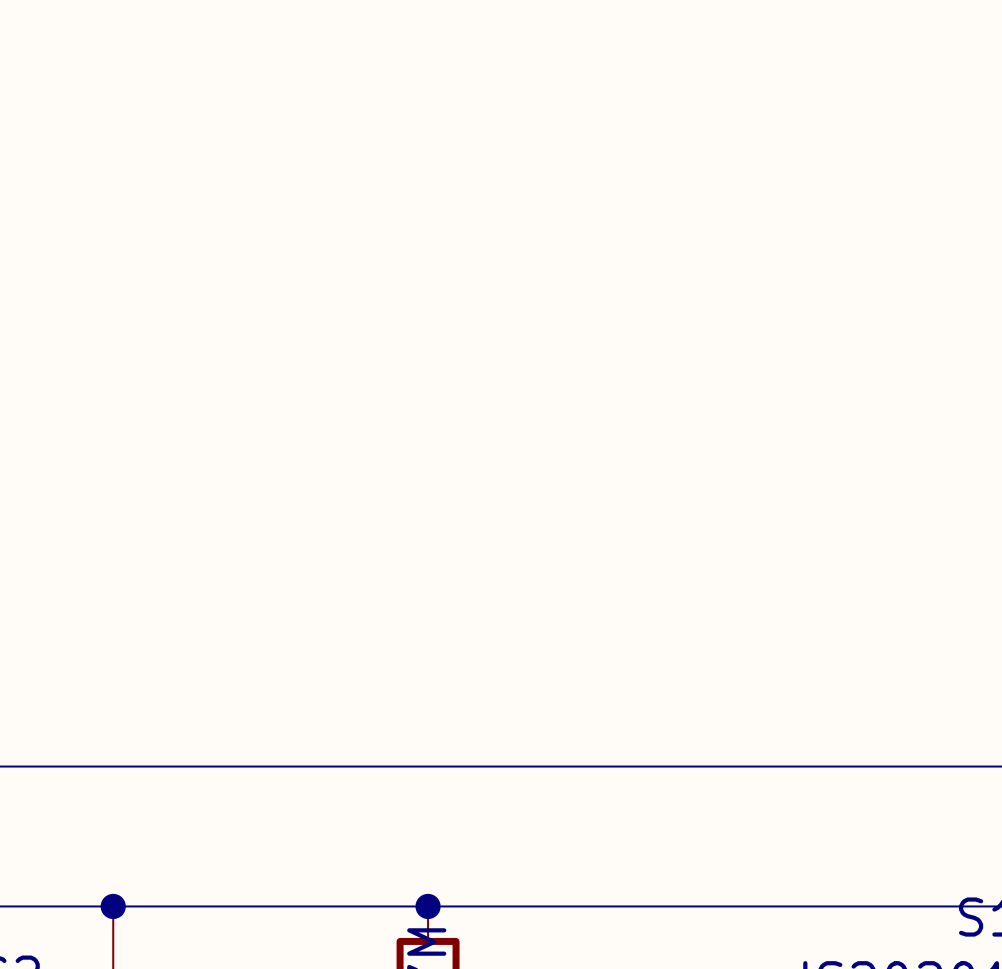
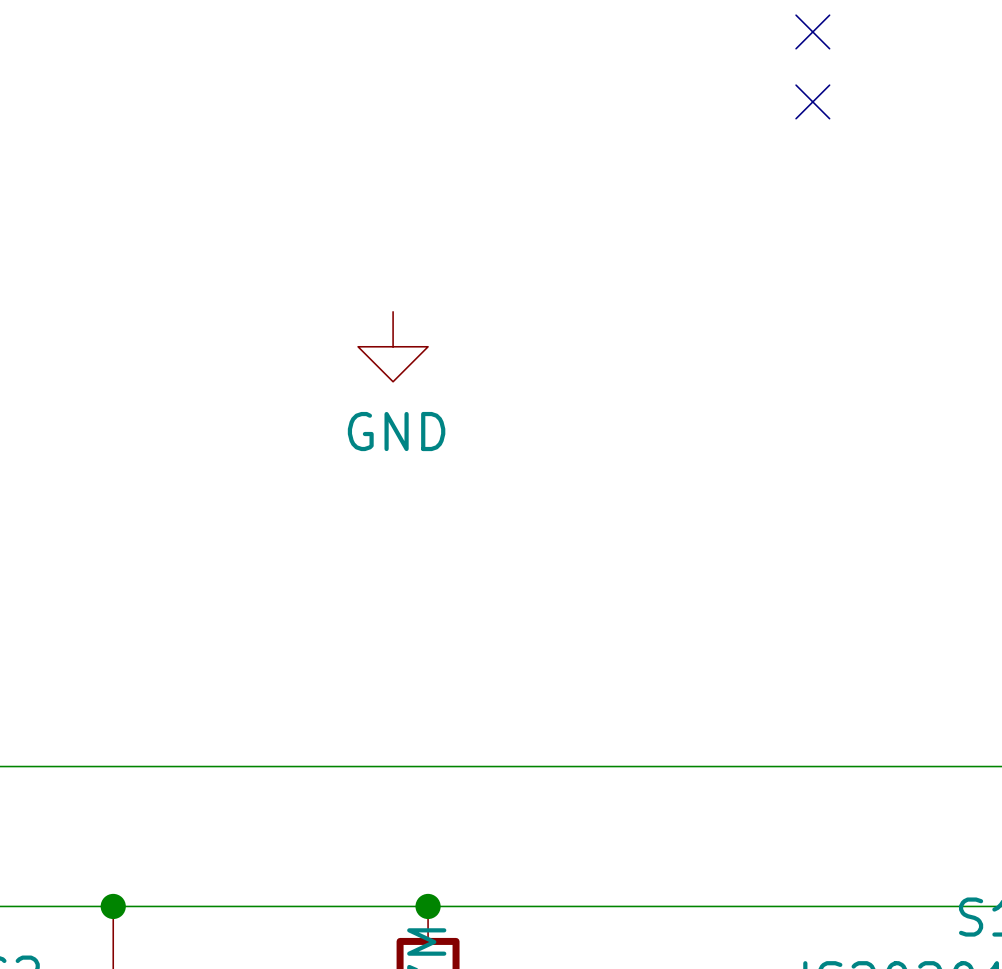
no-connect mark: none -> (812, 31)
no-connect mark: none -> (812, 101)
power symbol: none -> GND (393, 346)

